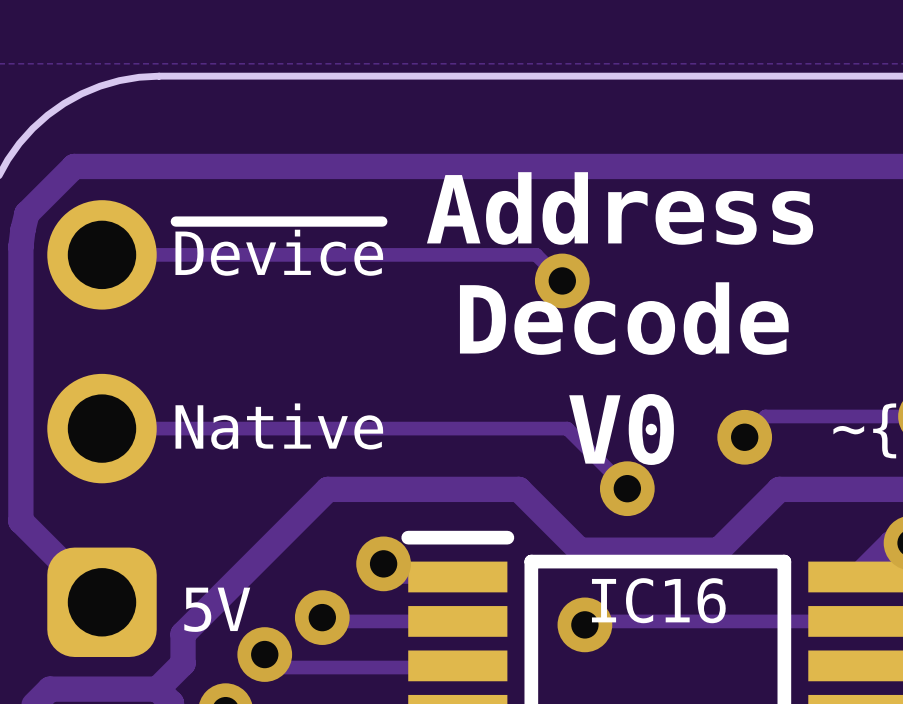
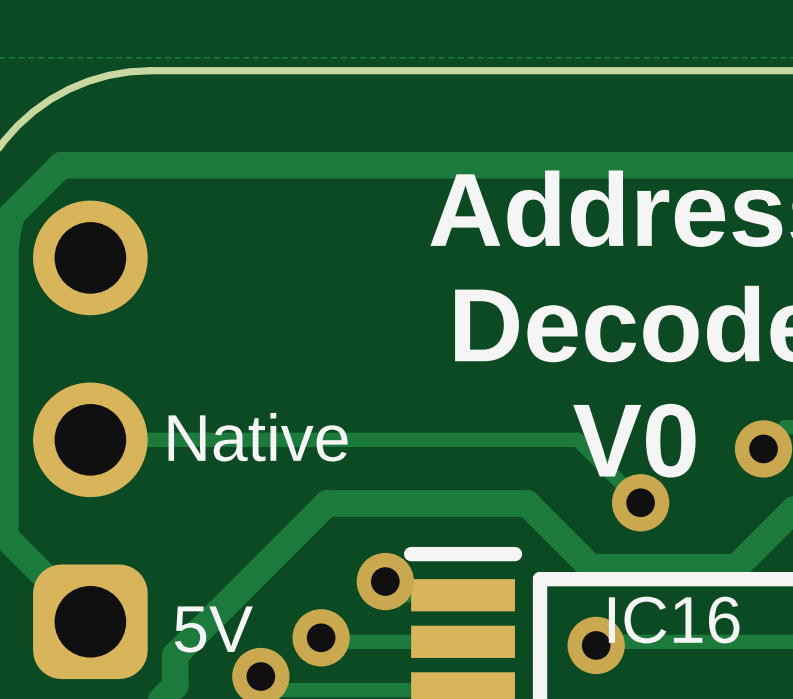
text: ~{Device} (279, 248) -> none
track: (102, 254) (536, 254) (562, 280) -> none
via: (562, 280) -> none

